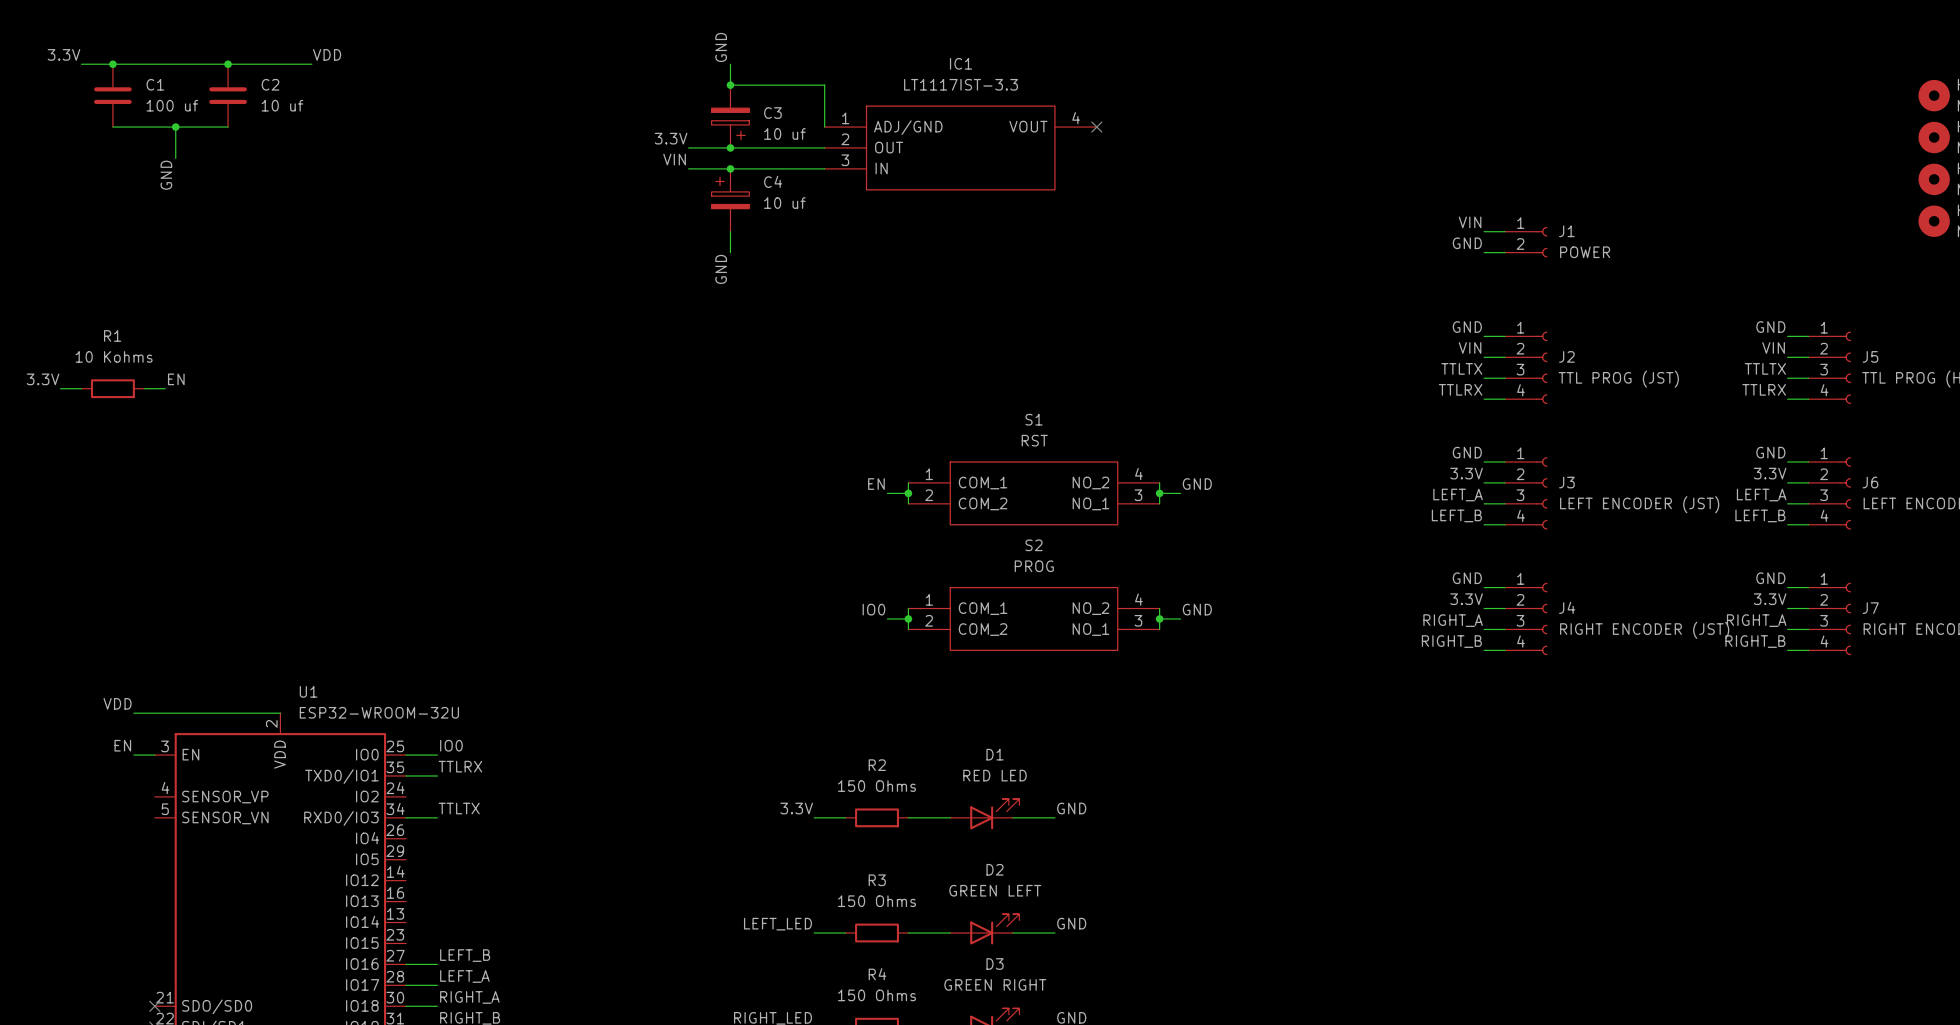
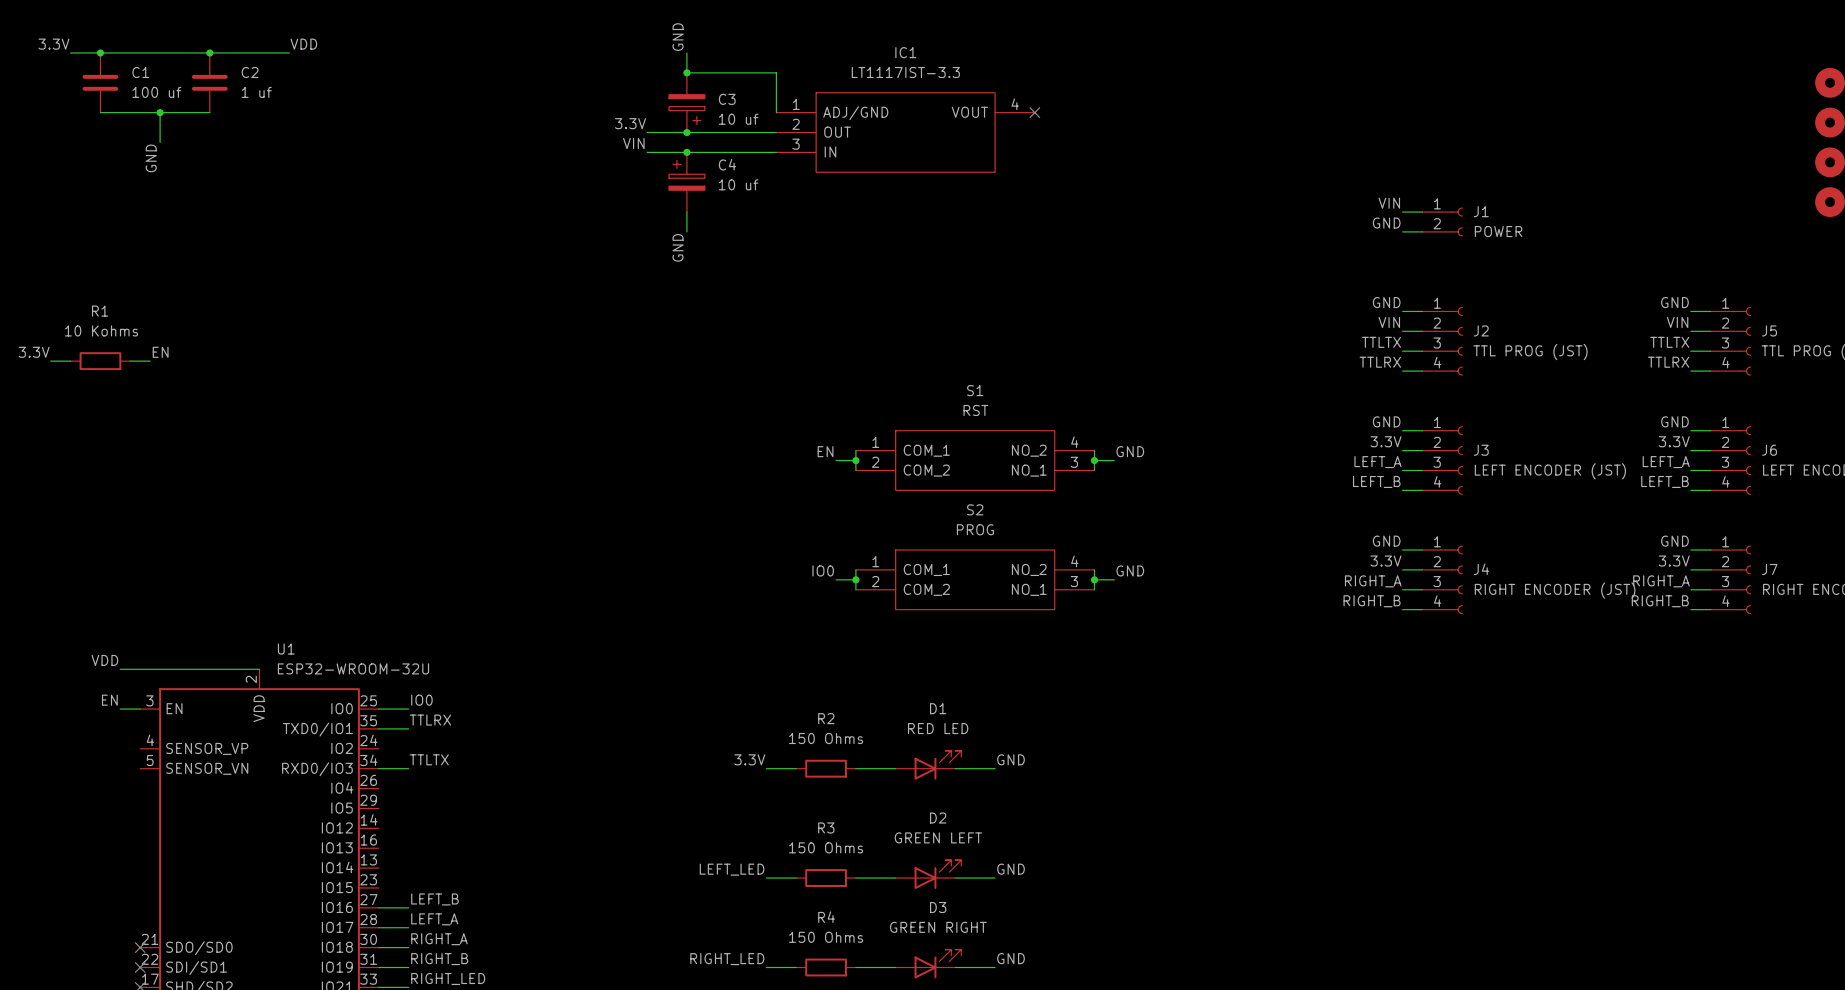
C2 value: 10 uf (282, 105) -> 1 uf (256, 92)

